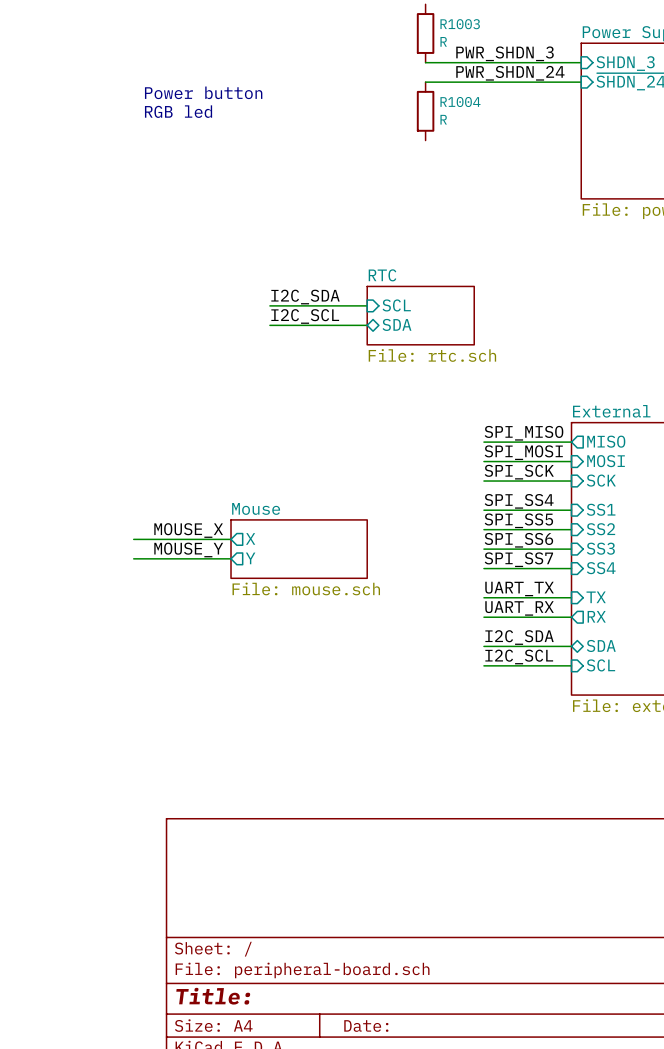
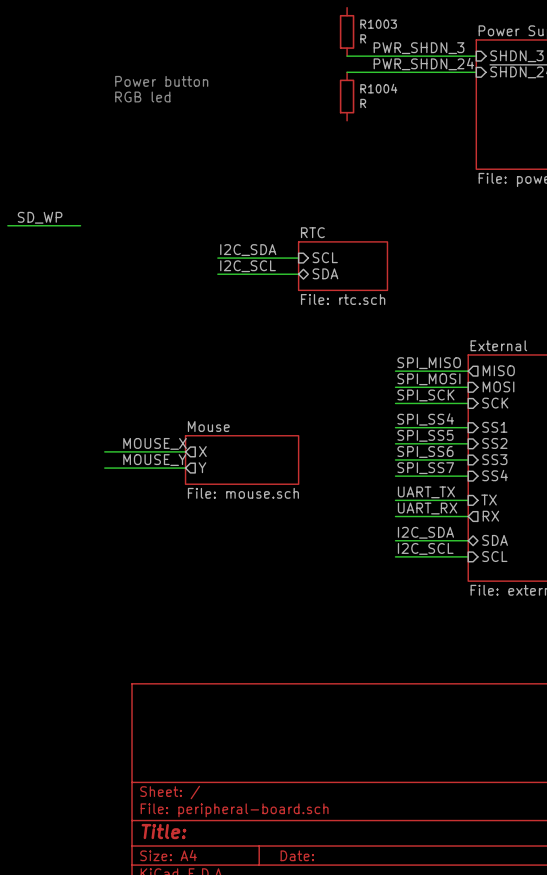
label: none -> SD_WP (40, 217)
wire: none -> (7, 225) (80, 225)

